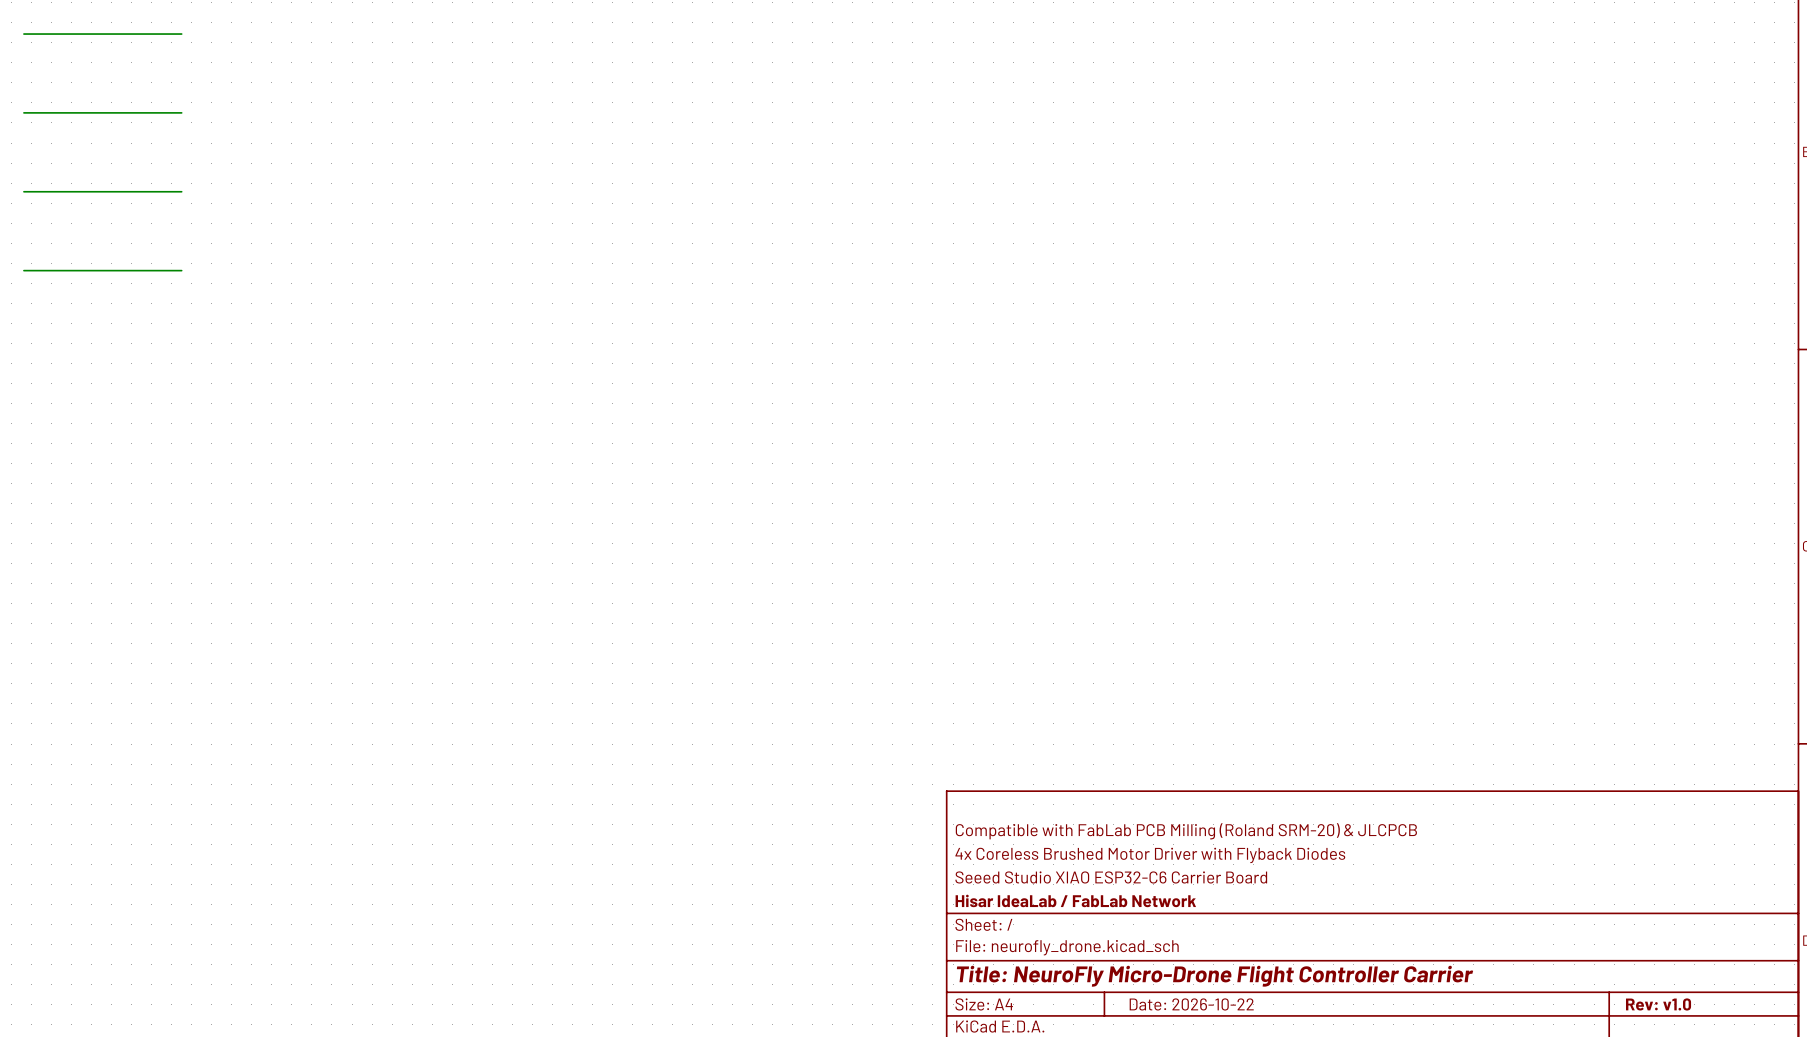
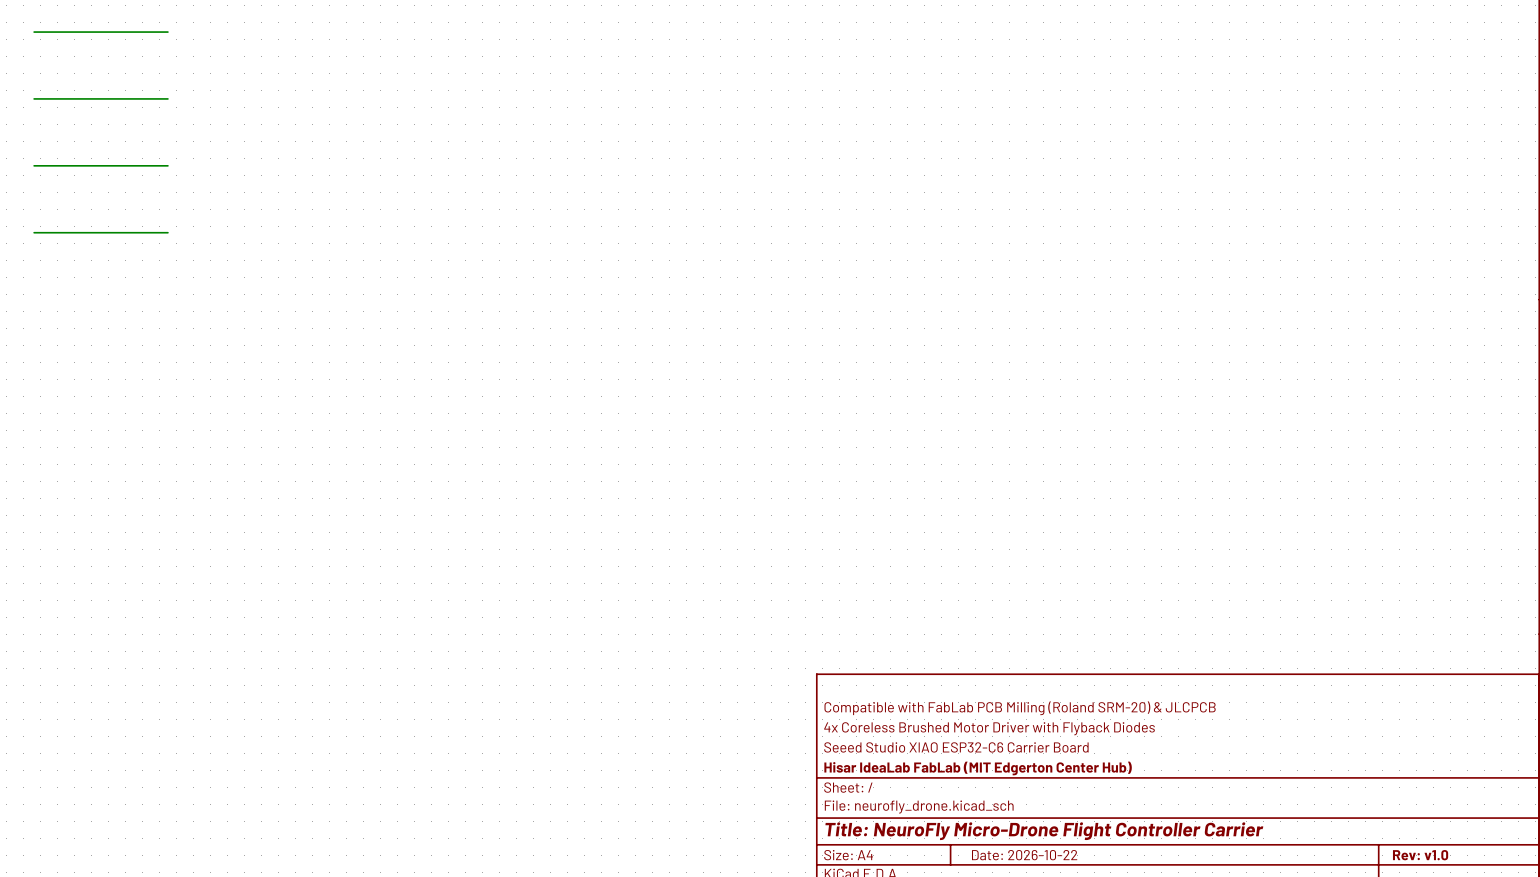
title block: Hisar IdeaLab / FabLab Network (1075, 900) -> Hisar IdeaLab FabLab (MIT Edgerton Center Hub) (978, 768)

